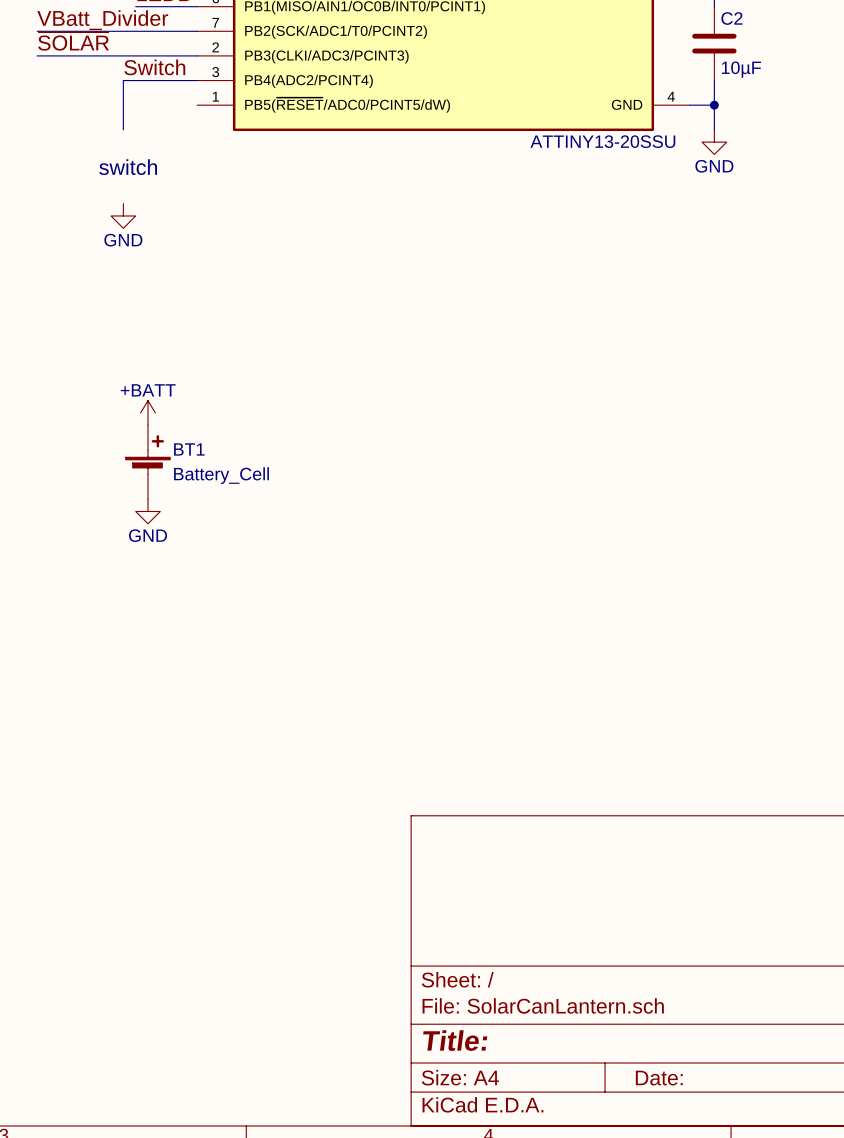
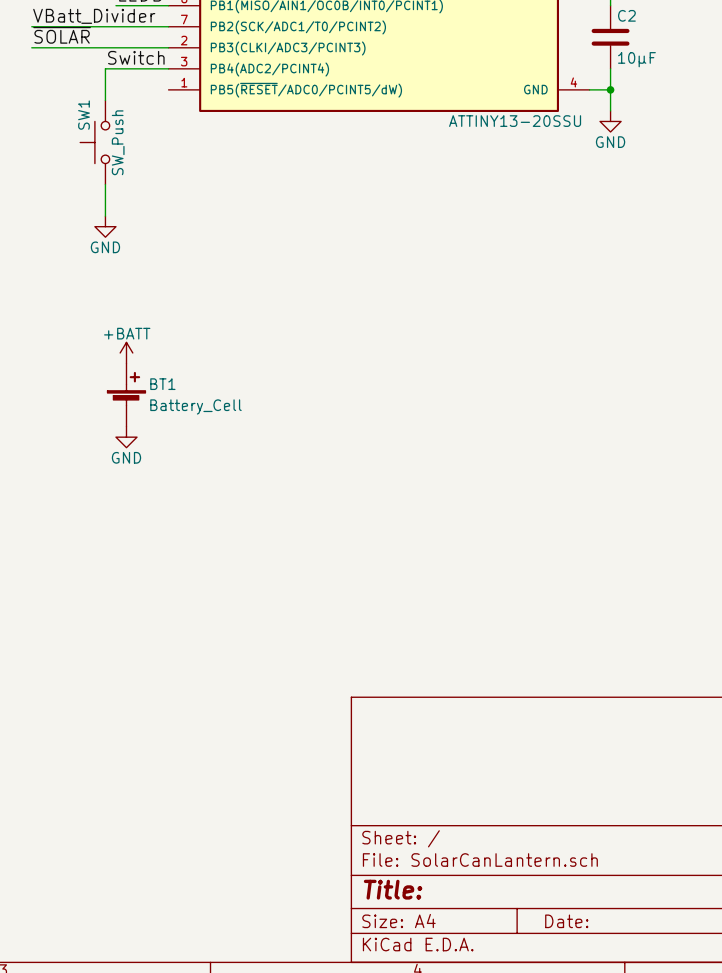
SW1: none -> SW_Push (94, 142)
text: switch (128, 167) -> none
wire: none -> (105, 184) (105, 216)
power symbol position: GND (123, 215) -> GND (105, 226)

